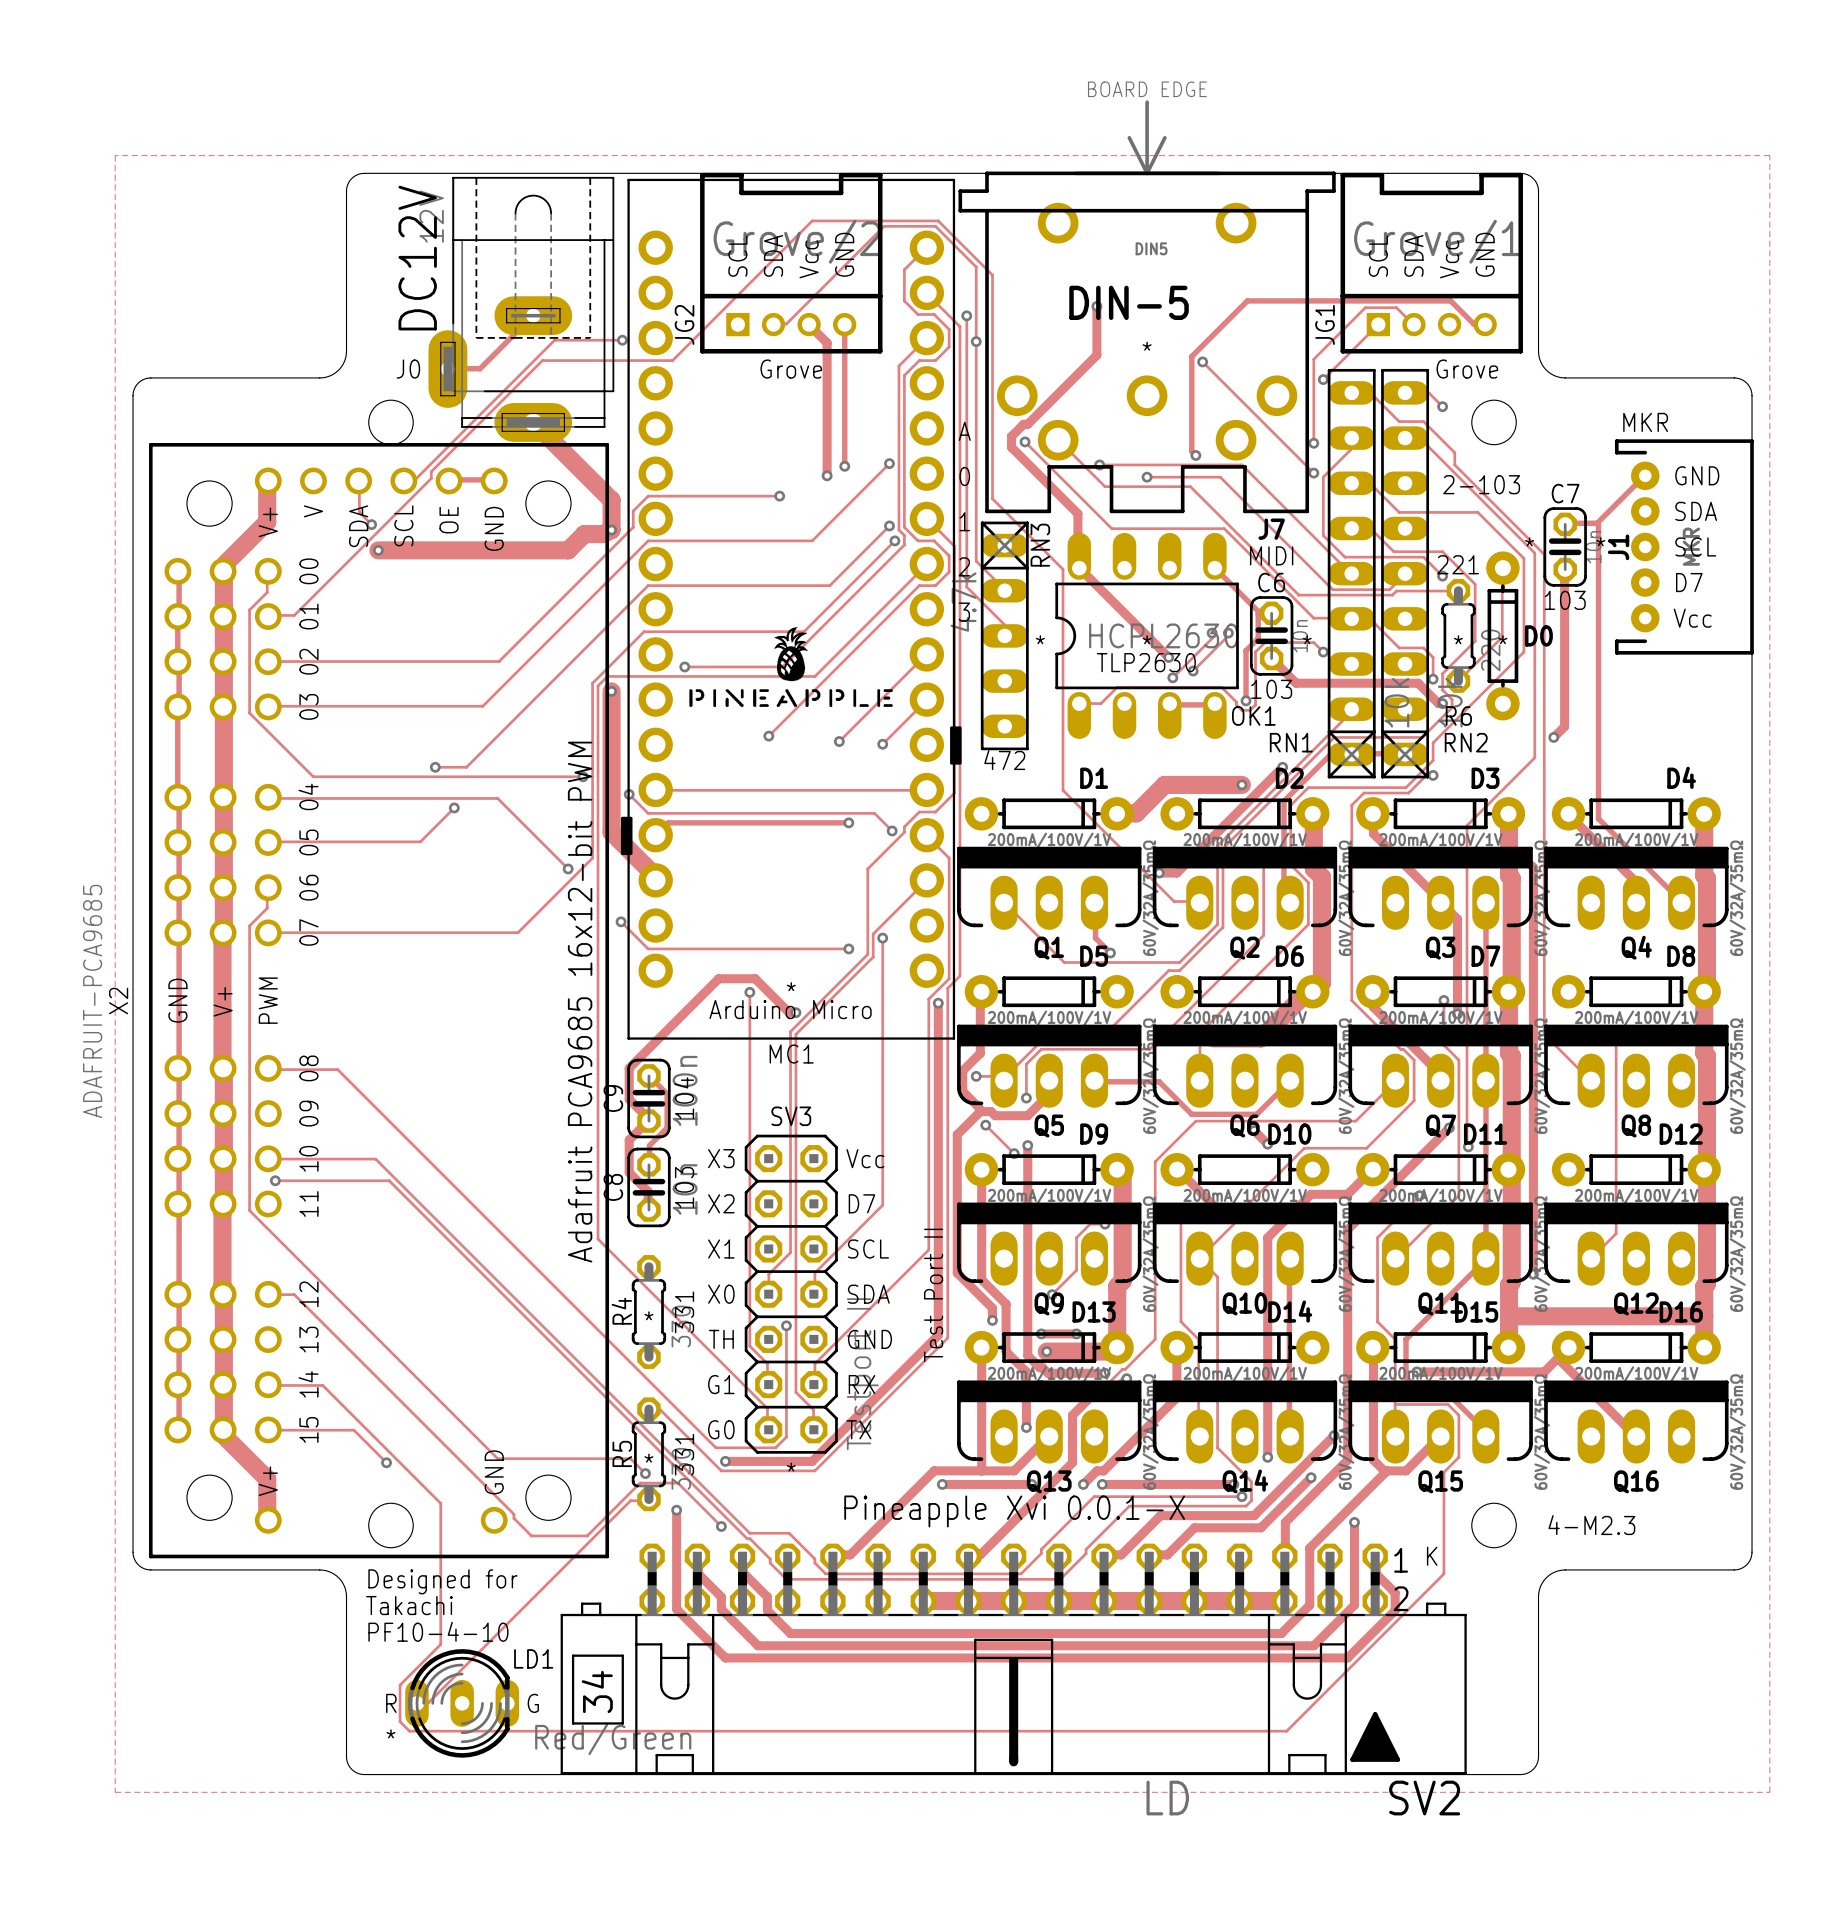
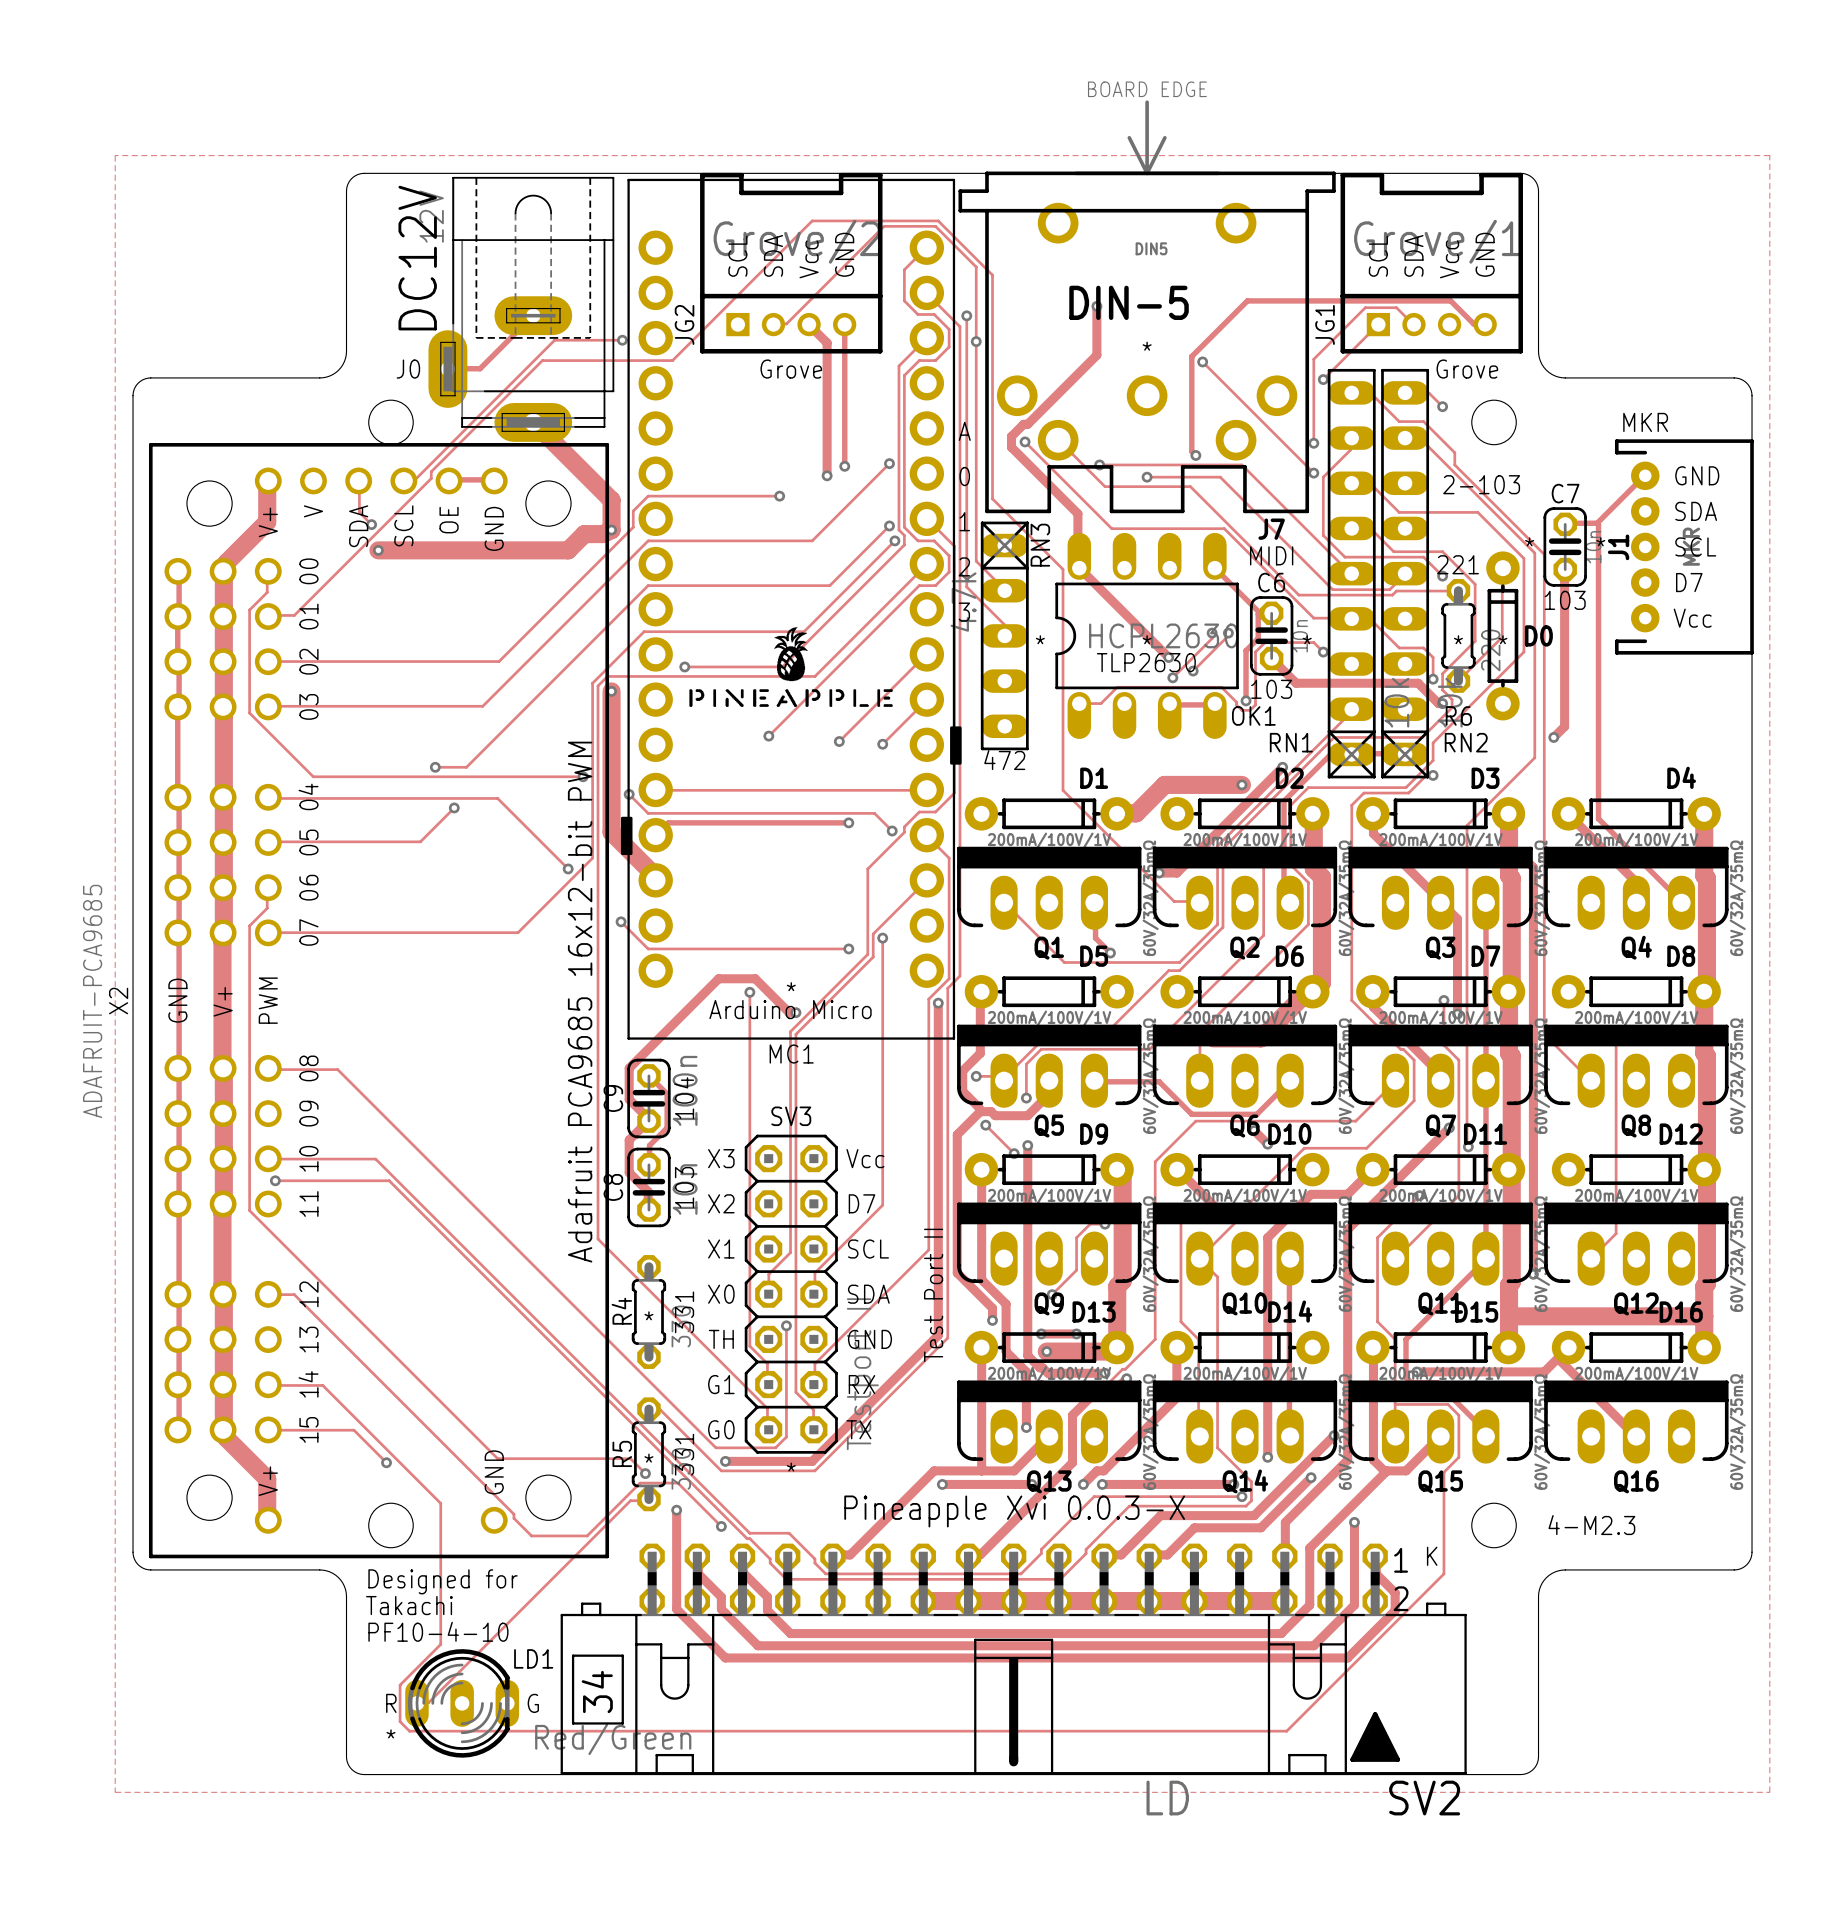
text: Pineapple Xvi 0.0.1-X (1014, 1511) -> Pineapple Xvi 0.0.3-X (1014, 1511)

